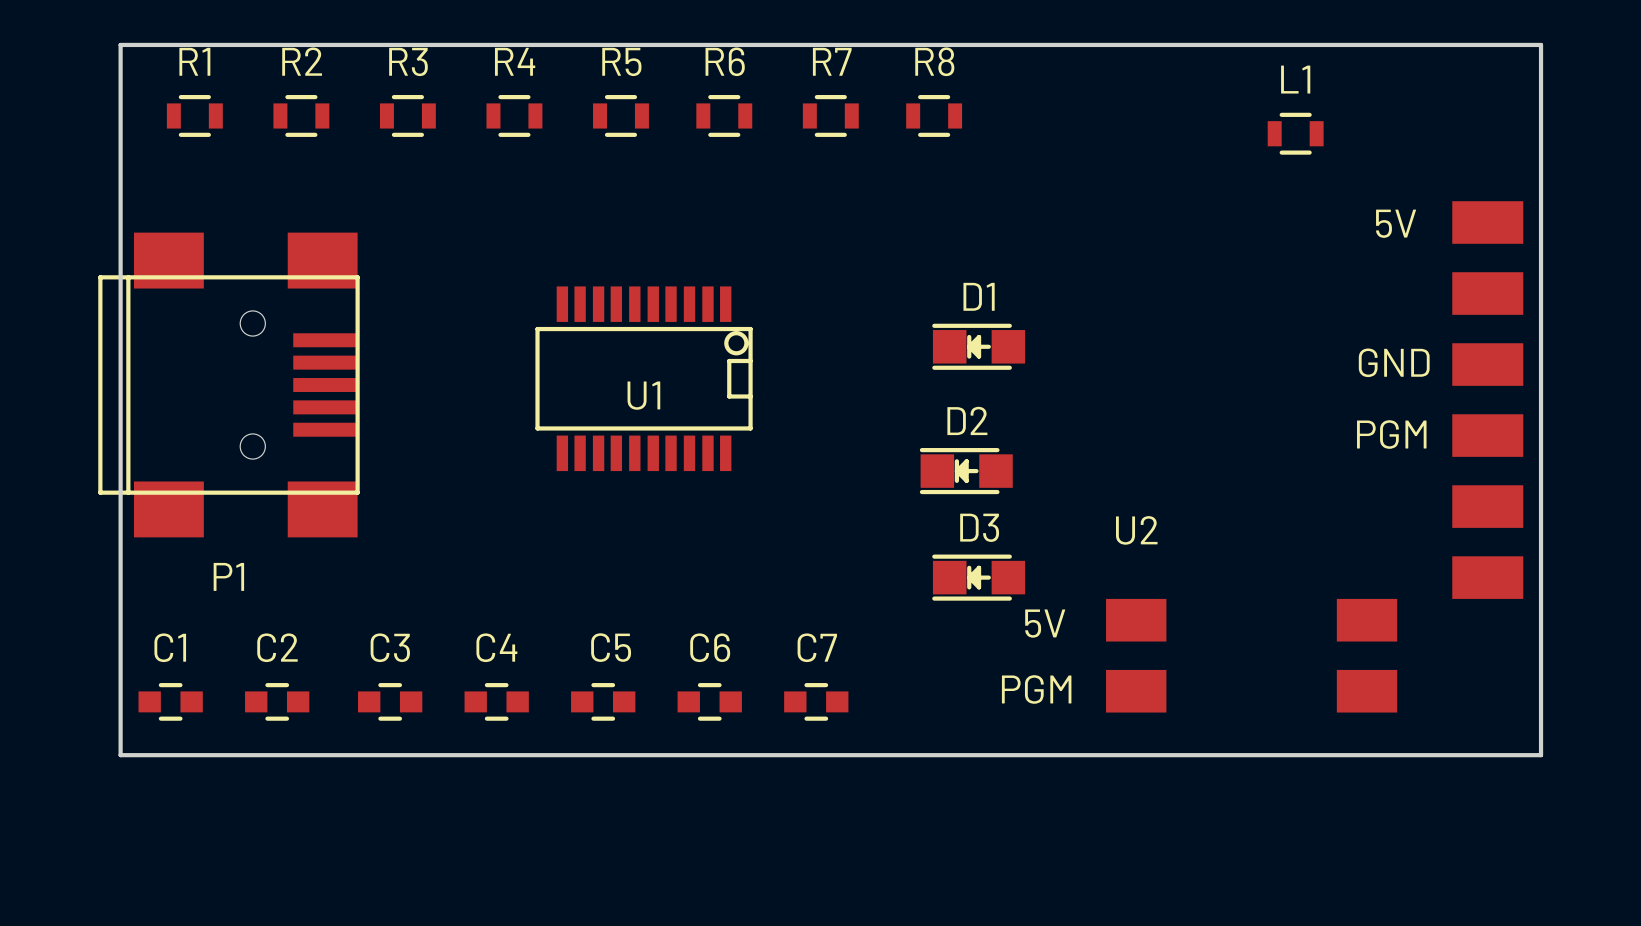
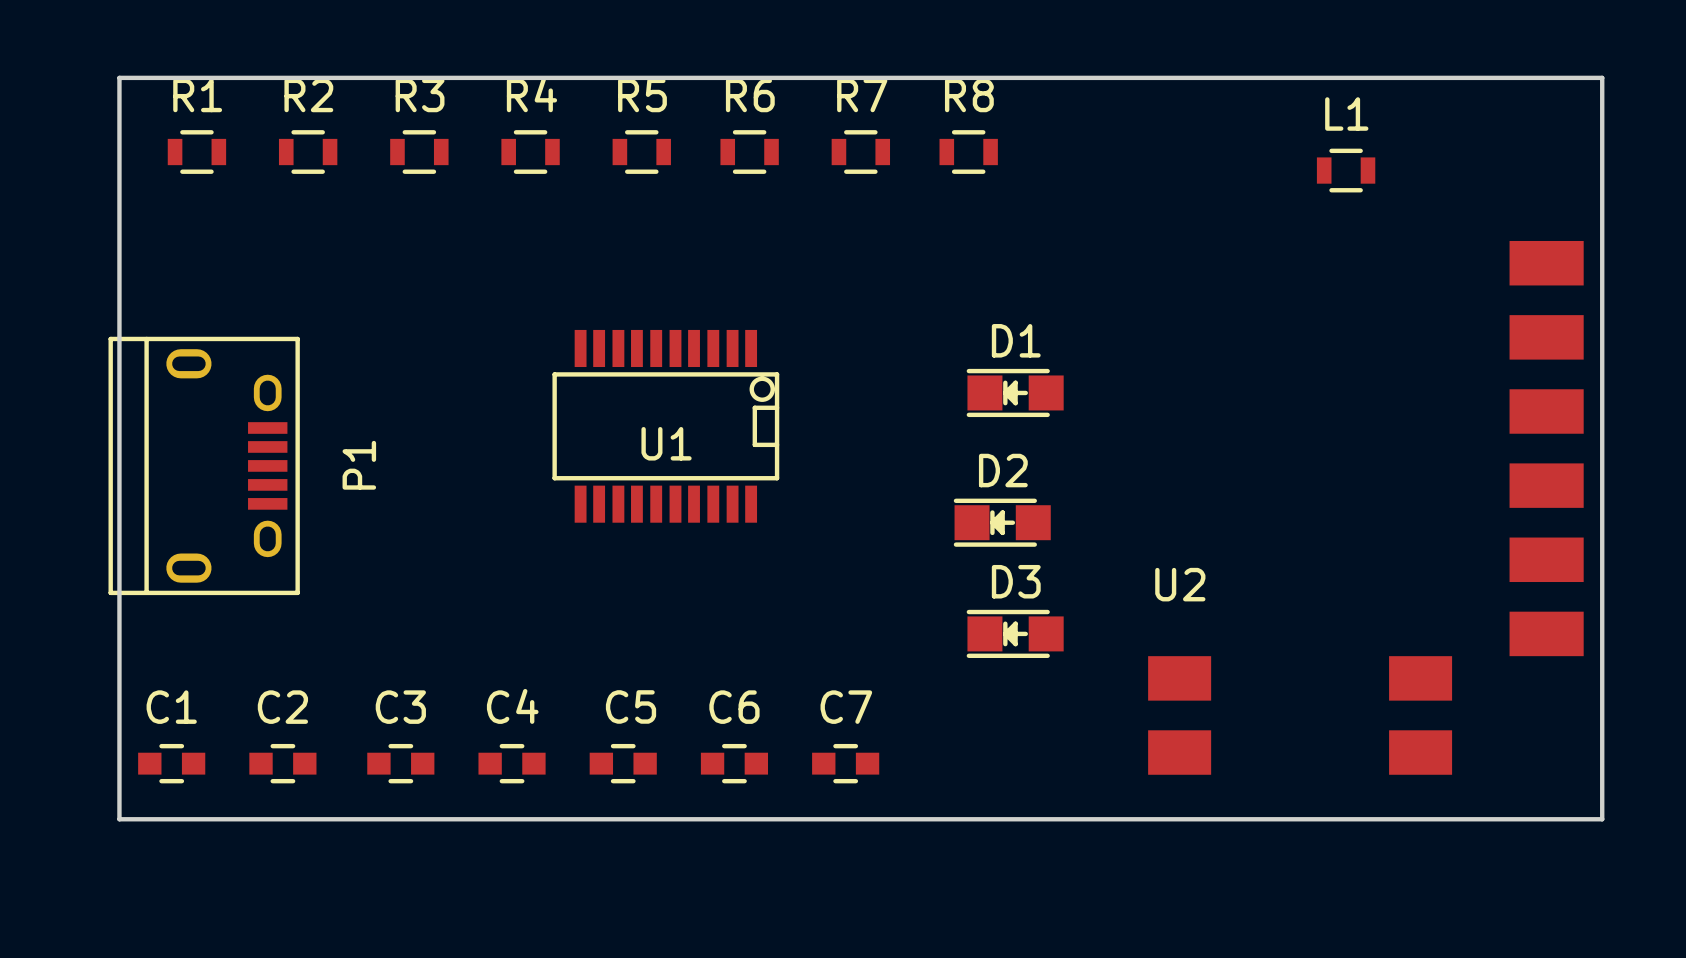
text: 5V (1396, 223) -> none
P1 footprint: [98, 232, 360, 538] -> [108, 336, 300, 596]
text: GND (1394, 362) -> none
text: PGM (1391, 434) -> none
P1 name position: P1 (228, 576) -> P1 (359, 465)
text: 5V (1045, 623) -> none
text: PGM (1036, 689) -> none

